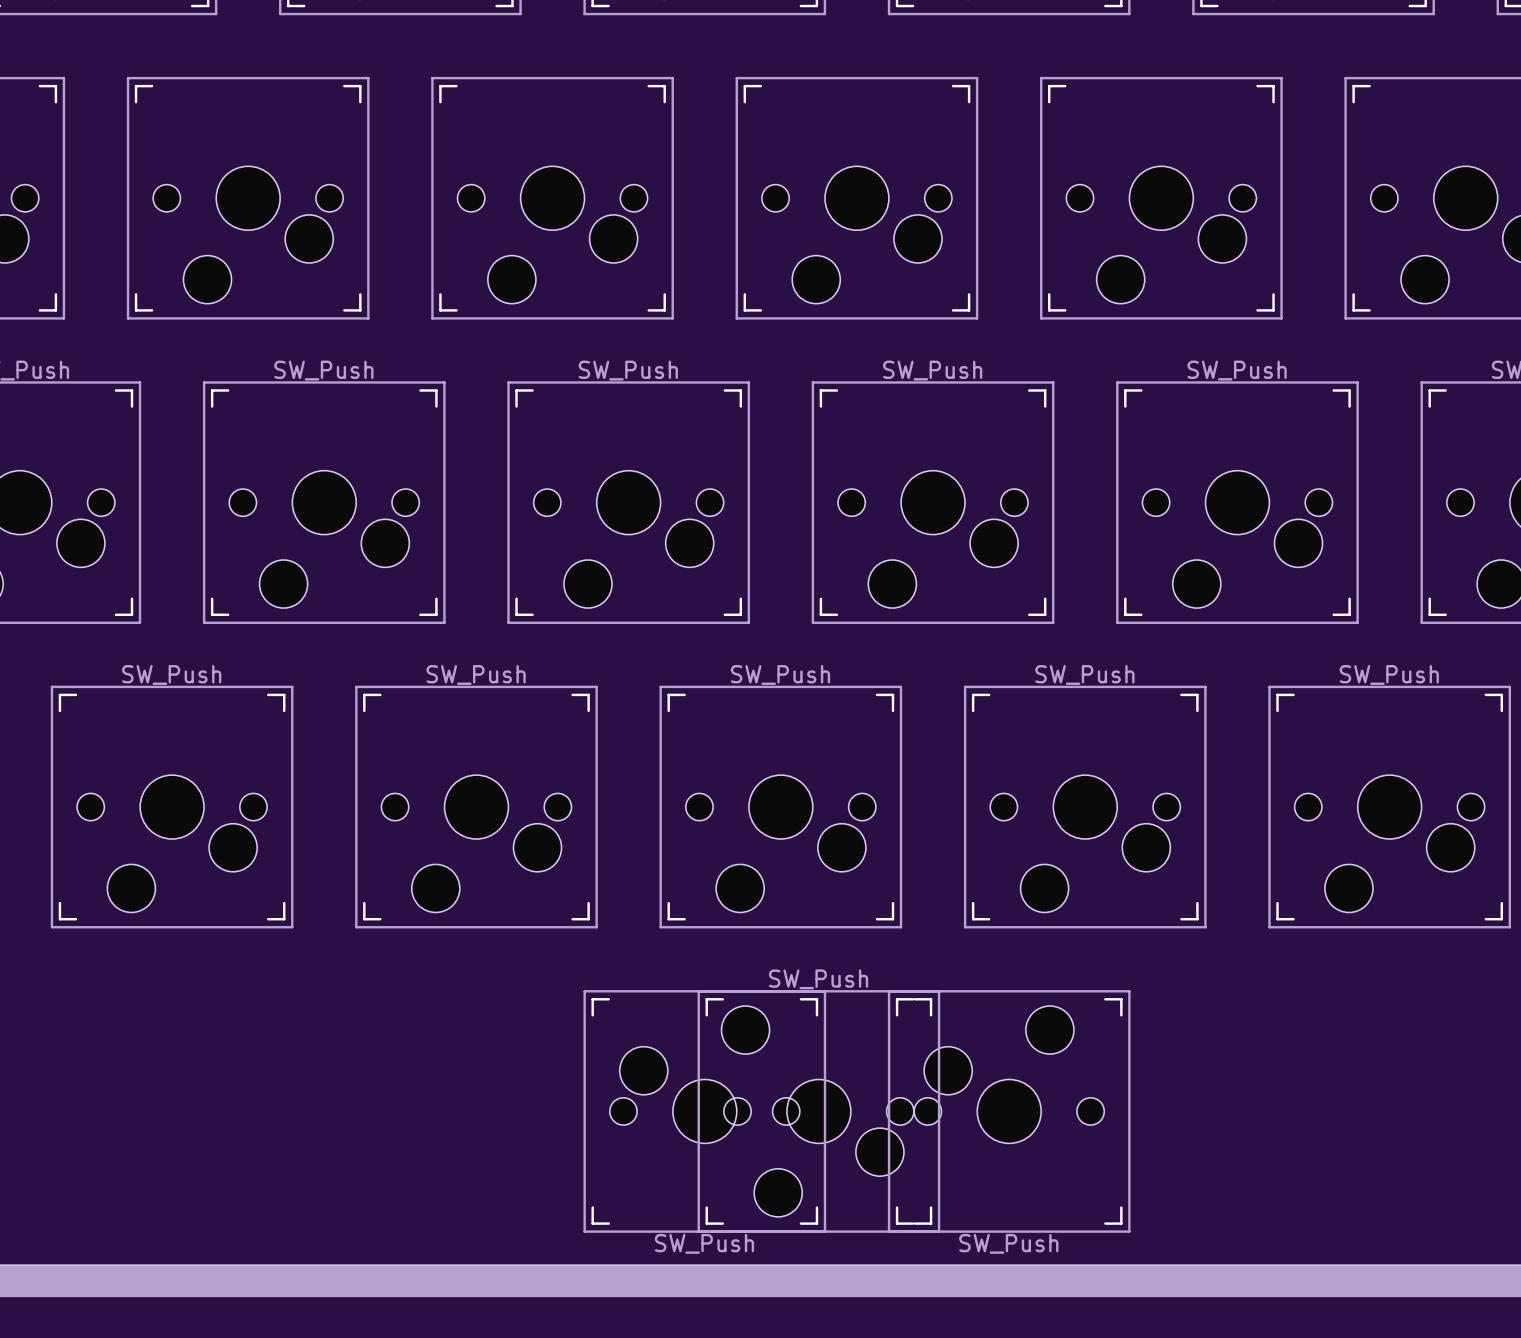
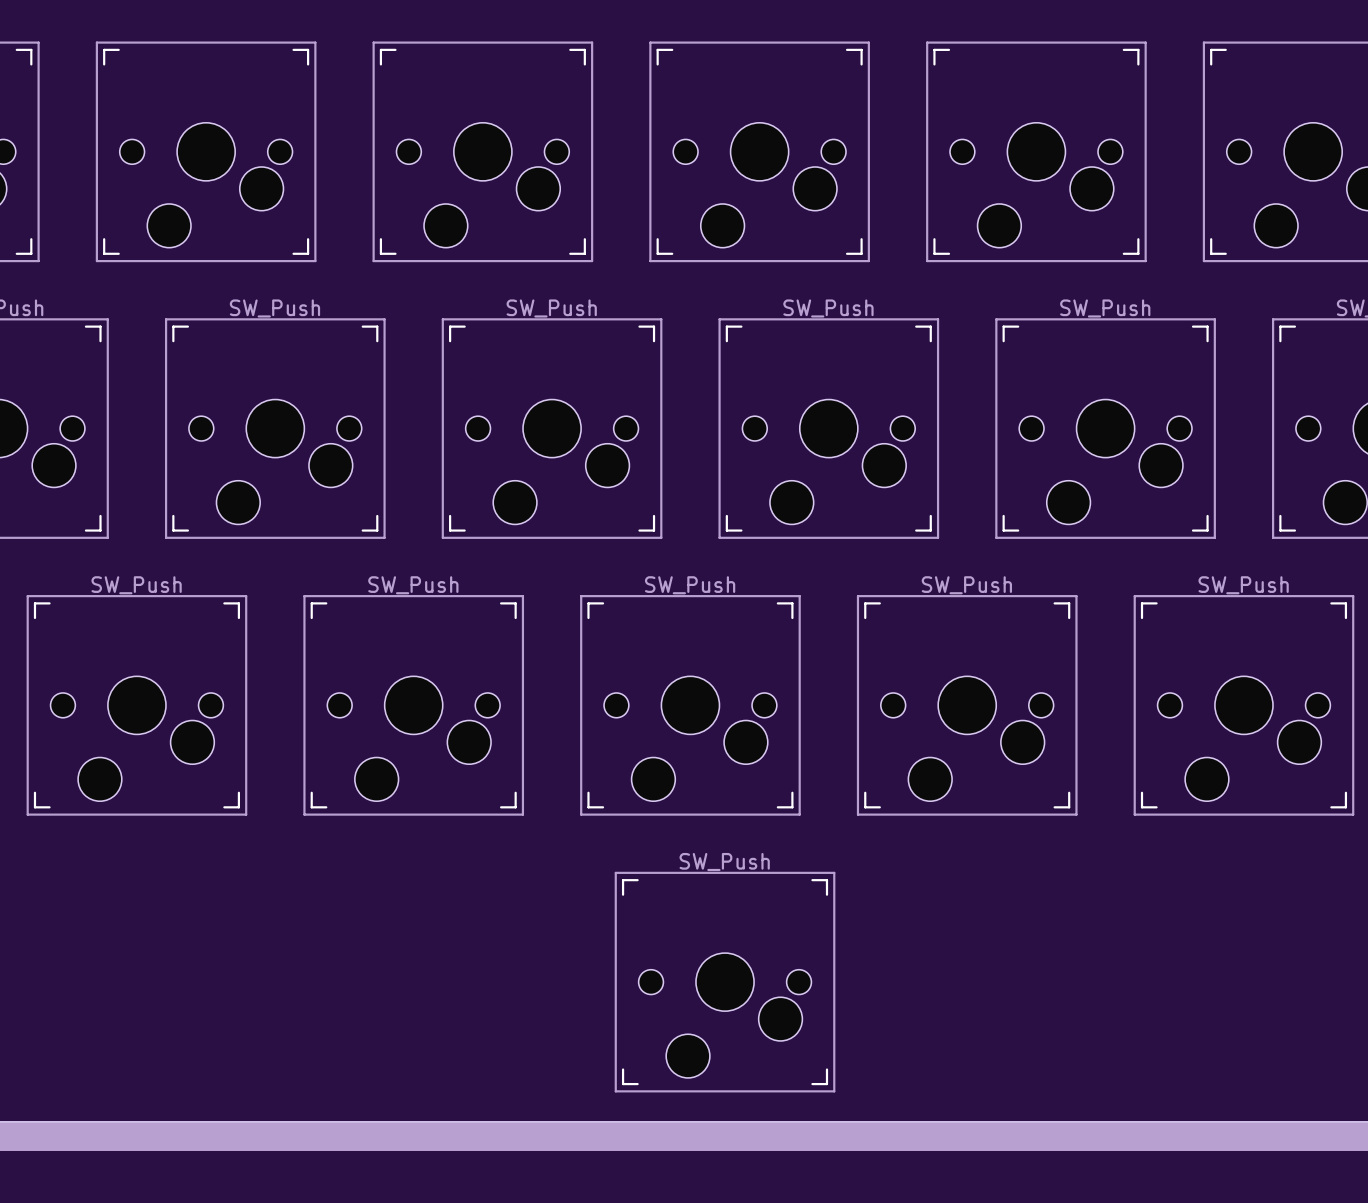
part: SW_Push (704, 1111) -> none
part: SW_Push (1009, 1111) -> none

